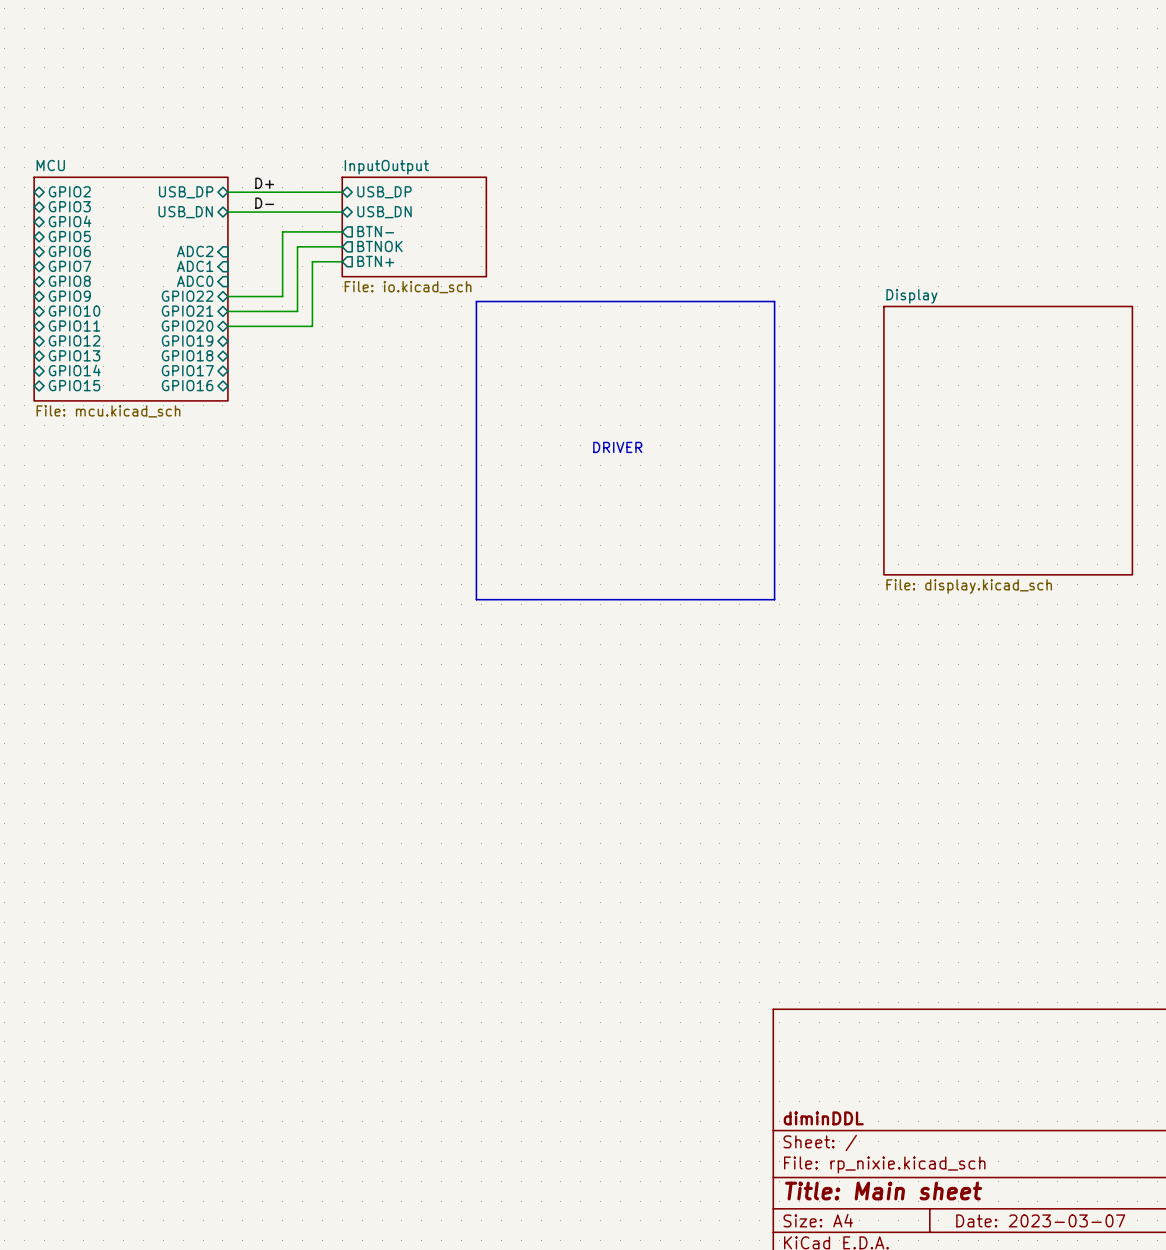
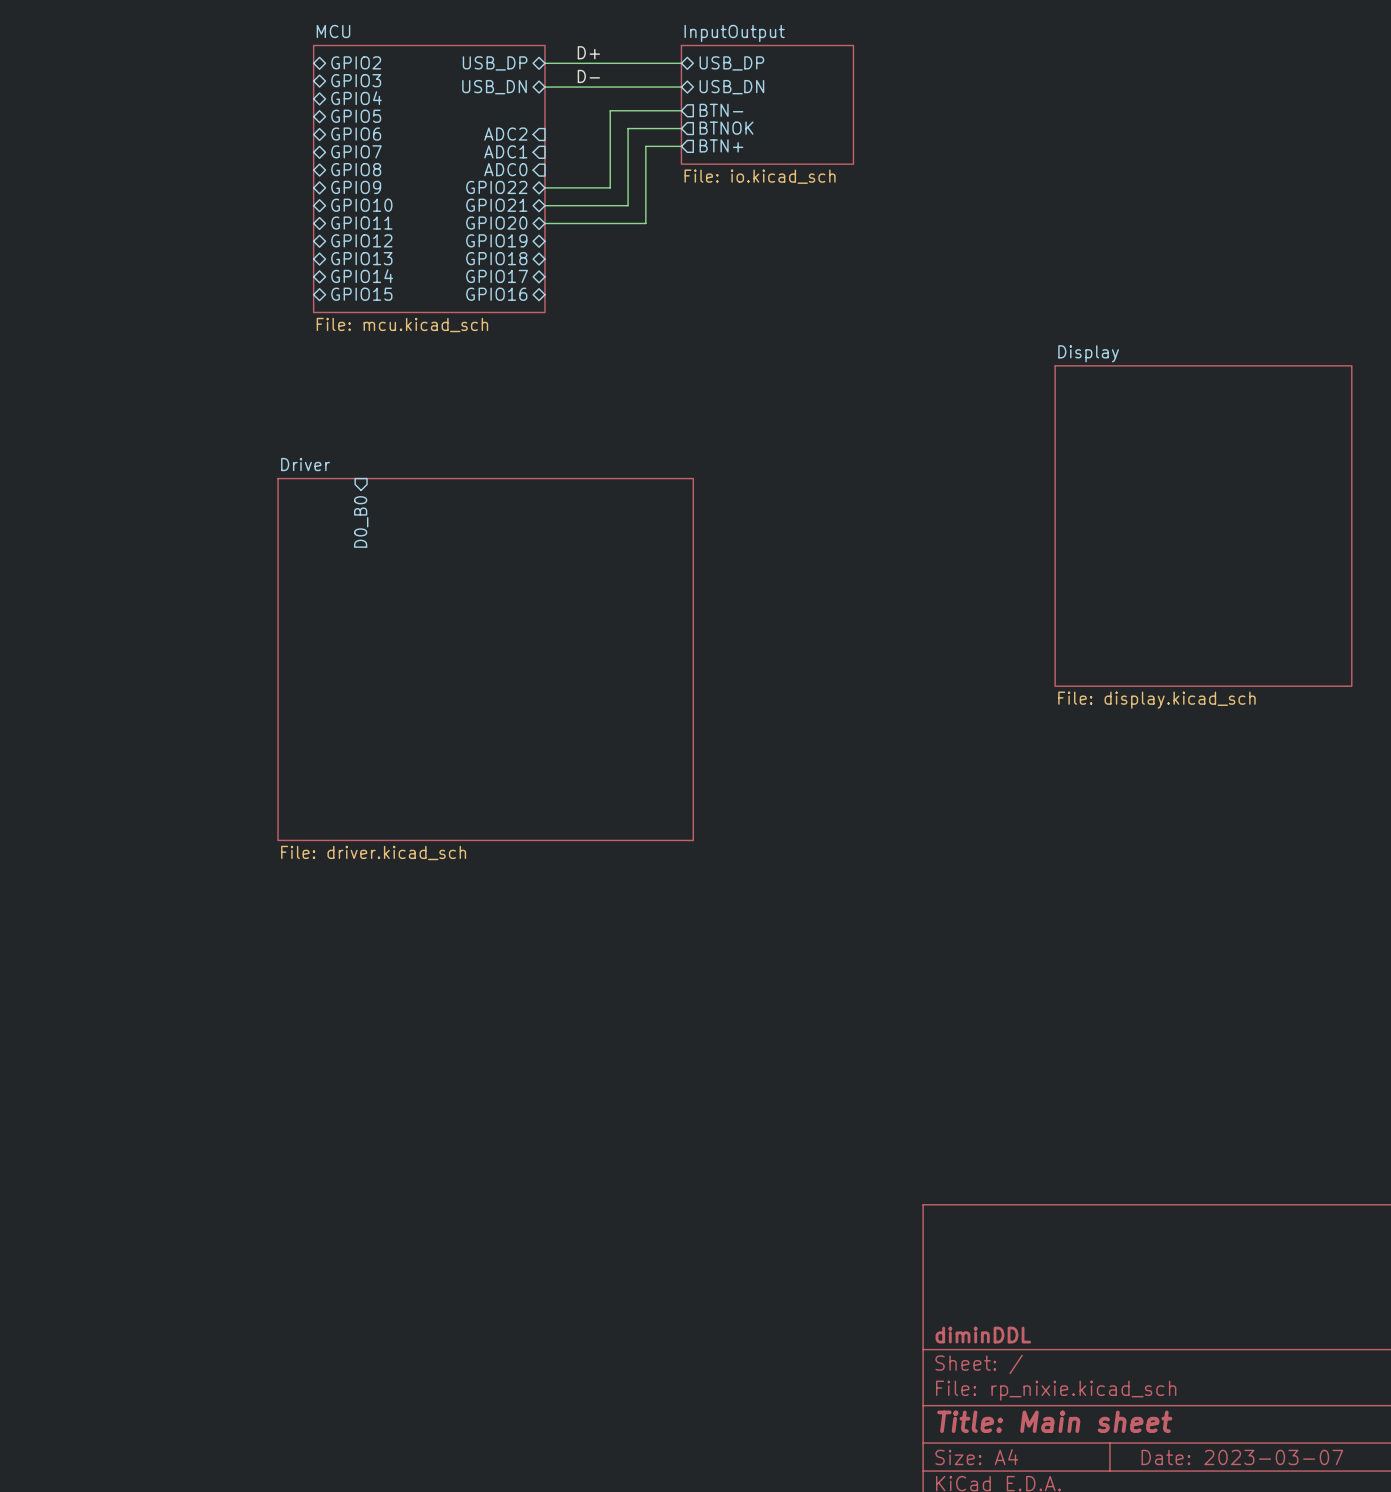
label: none -> D+ (588, 52)
sheet pin: none -> GPIO2 (356, 62)
sheet pin: none -> USB_DP (495, 63)
wire: none -> (544, 63) (681, 63)
sheet pin: none -> USB_DP (731, 63)
label: none -> D- (588, 76)
sheet pin: none -> GPIO3 (356, 80)
wire: none -> (544, 87) (681, 87)
sheet pin: none -> USB_DN (494, 87)
sheet pin: none -> USB_DN (731, 87)
sheet pin: none -> GPIO4 (356, 98)
sheet InputOutput: none -> File: io.kicad_sch (767, 104)
wire: none -> (681, 110) (610, 110) (610, 187) (544, 187)
sheet pin: none -> BTN- (721, 110)
sheet pin: none -> GPIO5 (356, 116)
wire: none -> (681, 128) (628, 128) (628, 205) (544, 205)
sheet pin: none -> BTNOK (726, 128)
sheet pin: none -> GPIO6 (356, 134)
sheet pin: none -> ADC2 (505, 134)
wire: none -> (681, 146) (645, 146) (645, 223) (544, 223)
sheet pin: none -> BTN+ (721, 145)
sheet pin: none -> GPIO7 (356, 151)
sheet pin: none -> ADC1 (505, 151)
sheet pin: none -> GPIO8 (356, 169)
sheet pin: none -> ADC0 (505, 169)
sheet MCU: none -> File: mcu.kicad_sch (429, 178)
sheet pin: none -> GPIO9 (356, 187)
sheet pin: none -> GPIO22 (496, 187)
sheet pin: none -> GPIO10 (361, 205)
sheet pin: none -> GPIO21 (496, 205)
label: D+ (264, 183) -> none
sheet pin: none -> GPIO11 (361, 223)
sheet pin: none -> GPIO20 (496, 223)
sheet pin: GPIO2 (69, 191) -> none
sheet pin: USB_DP (186, 192) -> none
wire: (227, 192) (342, 192) -> none
sheet pin: USB_DP (384, 192) -> none
sheet pin: none -> GPIO12 (361, 240)
sheet pin: none -> GPIO19 (496, 240)
label: D- (264, 203) -> none
sheet pin: GPIO3 (69, 206) -> none
sheet pin: USB_DN (185, 212) -> none
wire: (227, 212) (342, 212) -> none
sheet pin: USB_DN (384, 212) -> none
sheet pin: none -> GPIO13 (361, 258)
sheet pin: none -> GPIO18 (496, 258)
sheet pin: GPIO4 (70, 221) -> none
sheet InputOutput: File: io.kicad_sch (414, 226) -> none
sheet pin: none -> GPIO14 (362, 276)
wire: (342, 231) (282, 231) (282, 296) (227, 296) -> none
sheet pin: BTN- (375, 231) -> none
sheet pin: none -> GPIO17 (497, 276)
sheet pin: GPIO5 (69, 236) -> none
sheet pin: none -> GPIO15 (361, 294)
wire: (342, 246) (297, 246) (297, 311) (227, 311) -> none
sheet pin: BTNOK (380, 246) -> none
sheet pin: none -> GPIO16 (496, 294)
sheet pin: GPIO6 (69, 251) -> none
sheet pin: ADC2 (195, 251) -> none
wire: (342, 261) (312, 261) (312, 326) (227, 326) -> none
sheet pin: BTN+ (375, 261) -> none
sheet pin: GPIO7 (70, 266) -> none
sheet pin: ADC1 (195, 266) -> none
sheet pin: GPIO8 (69, 281) -> none
sheet pin: ADC0 (195, 281) -> none
sheet MCU: File: mcu.kicad_sch (131, 289) -> none
sheet pin: GPIO9 (69, 296) -> none
sheet pin: GPIO22 (187, 296) -> none
line: (476, 301) (476, 599) (774, 599) (774, 301) (476, 301) -> none
sheet pin: GPIO10 (74, 311) -> none
sheet pin: GPIO21 (187, 311) -> none
sheet pin: GPIO11 (74, 325) -> none
sheet pin: GPIO20 (187, 325) -> none
sheet pin: GPIO12 (74, 340) -> none
sheet pin: GPIO19 (187, 340) -> none
sheet pin: GPIO13 (74, 355) -> none
sheet pin: GPIO18 (187, 355) -> none
sheet pin: GPIO14 (74, 370) -> none
sheet pin: GPIO17 (187, 370) -> none
sheet pin: GPIO15 (74, 385) -> none
sheet pin: GPIO16 (187, 385) -> none
sheet pin: none -> D0_B0 (361, 521)
text: DRIVER (617, 447) -> none
sheet Driver: none -> File: driver.kicad_sch (485, 659)

